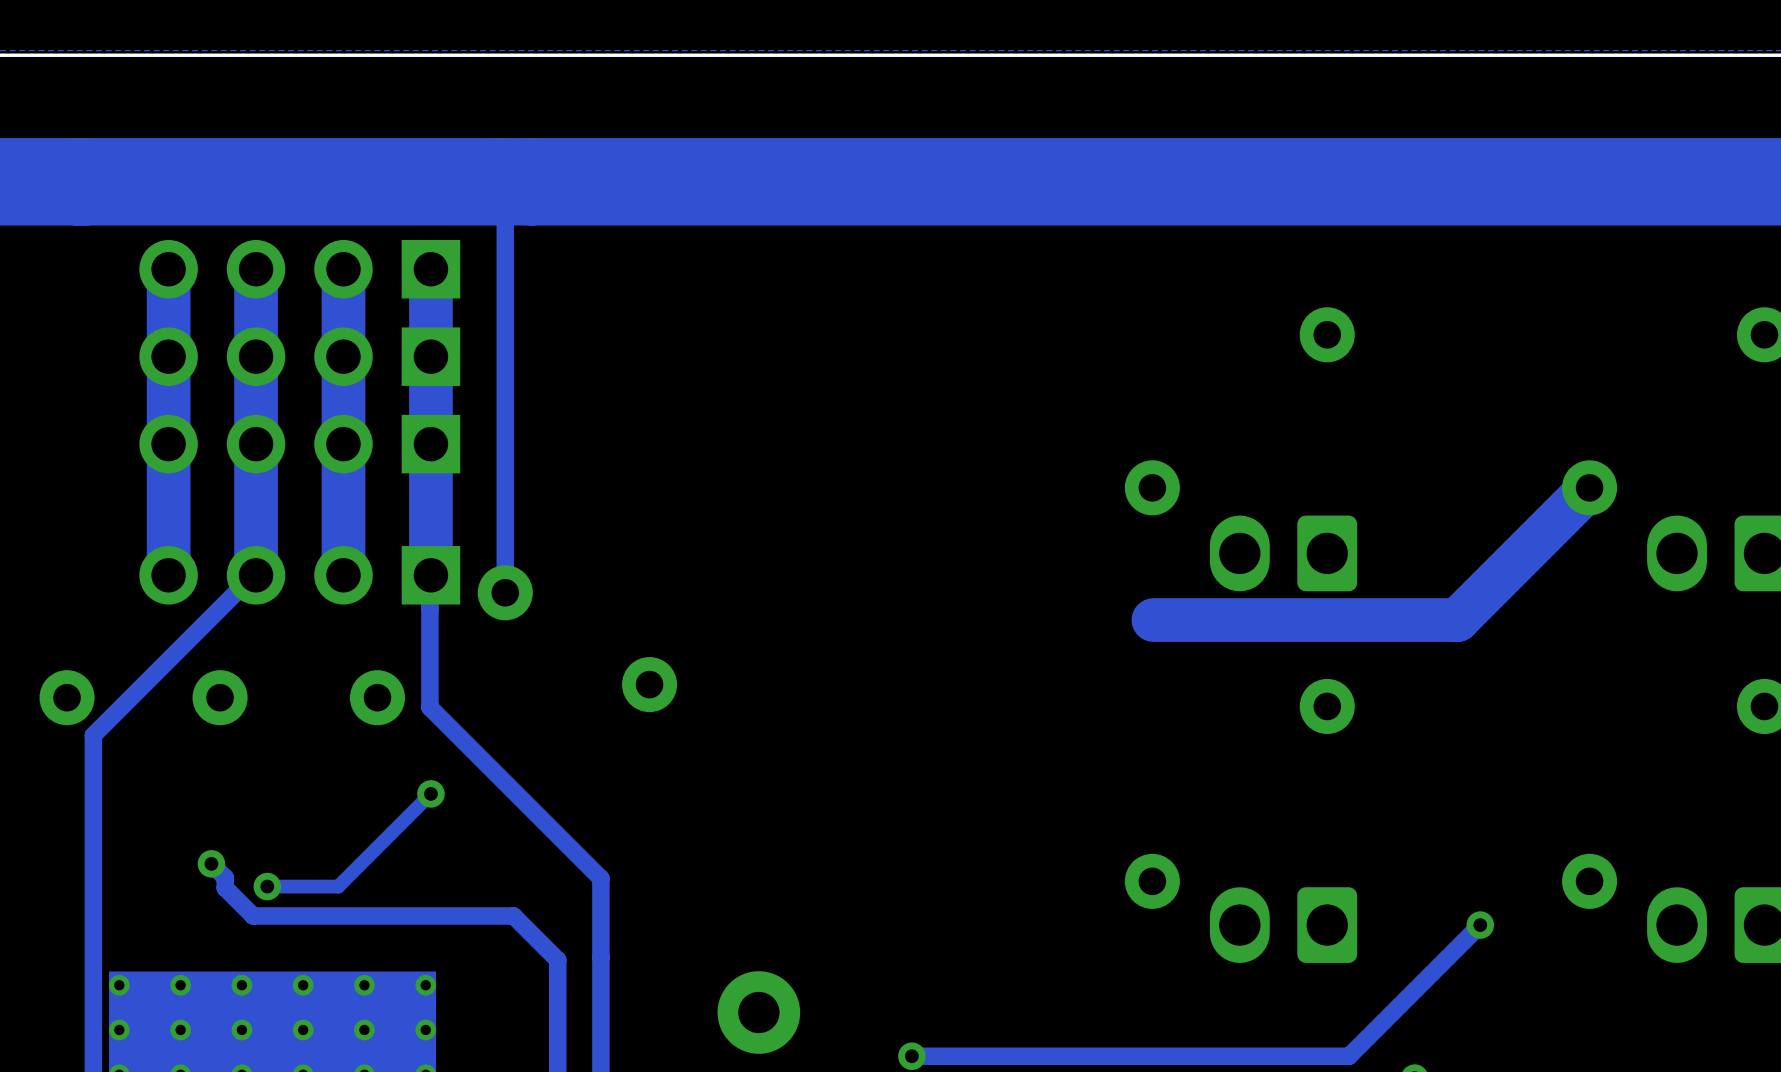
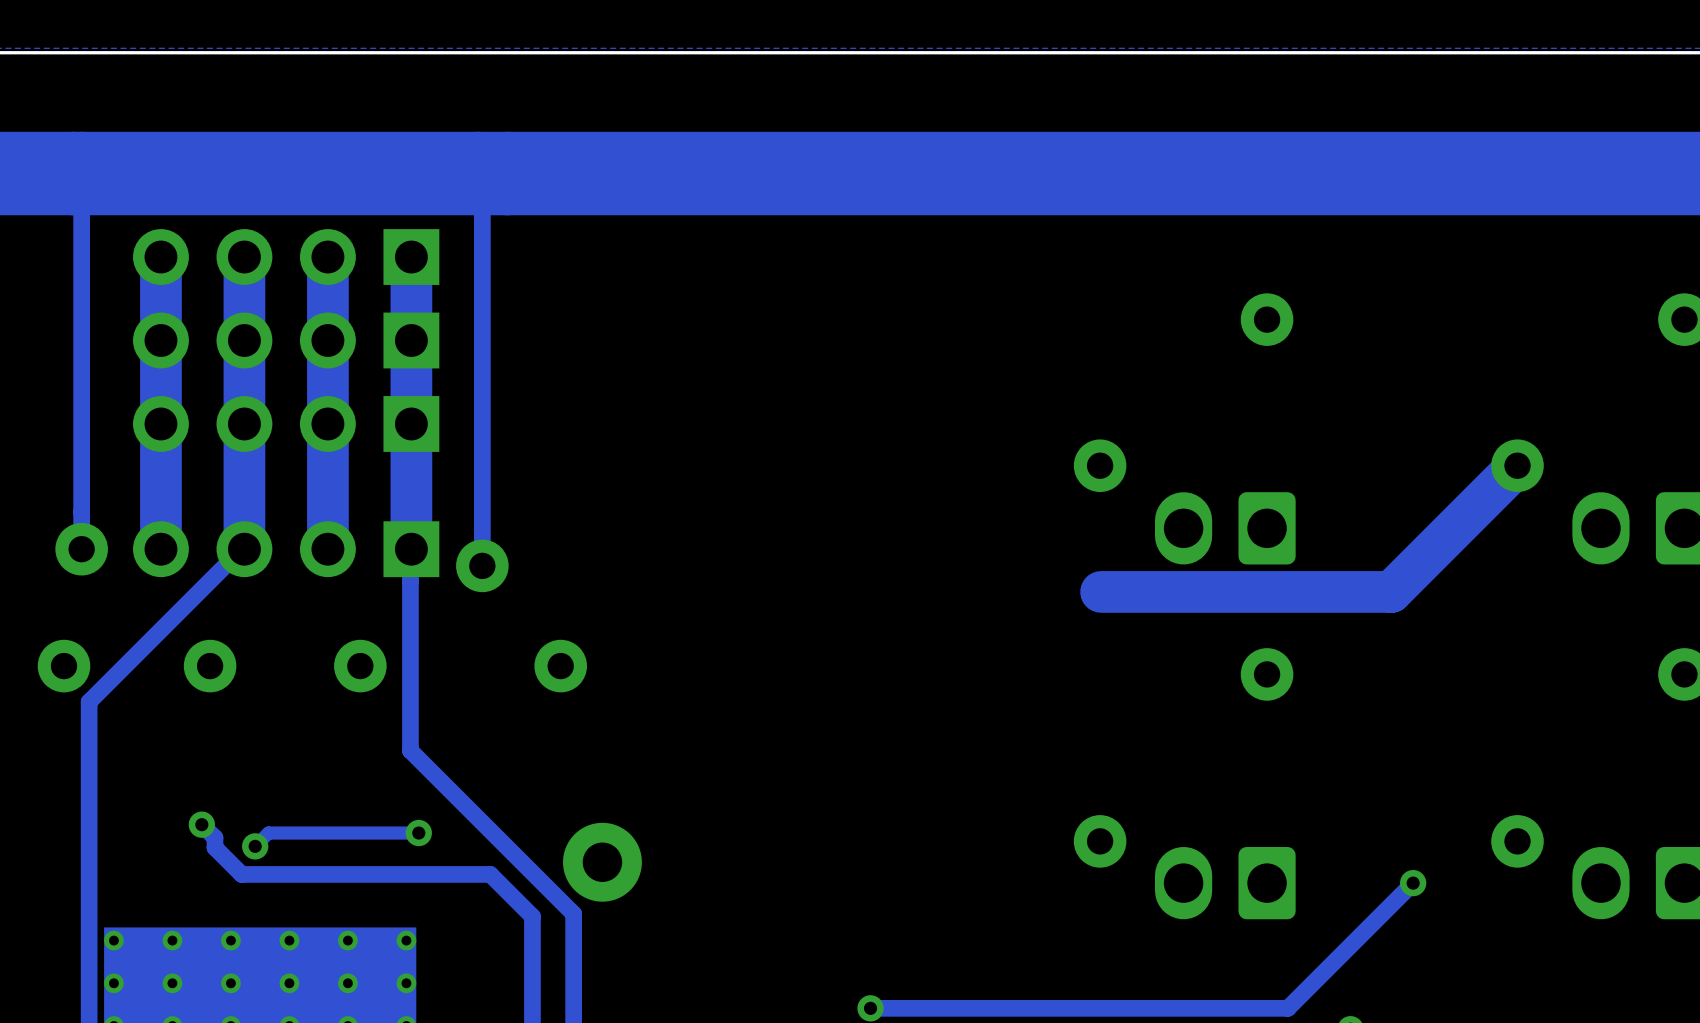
track: none -> (81, 173) (81, 549)
via: none -> (81, 549)
via position: (649, 684) -> (560, 666)
track: (429, 707) (600, 878) (600, 957) -> (410, 675) (410, 750) (573, 913)
track: (430, 793) (338, 886) (267, 886) -> (418, 833) (268, 833) (255, 846)
via position: (430, 793) -> (418, 833)
via position: (758, 1012) -> (602, 862)

